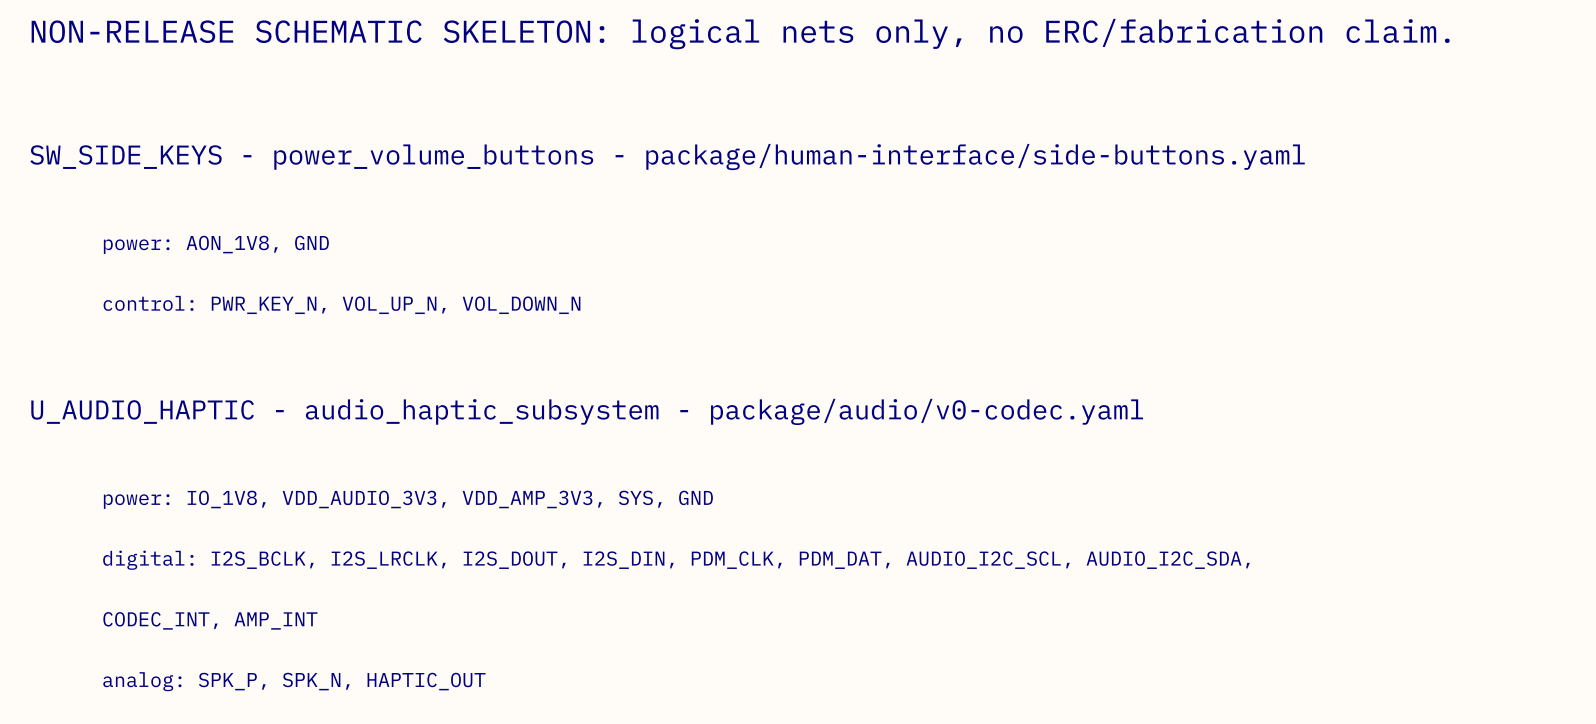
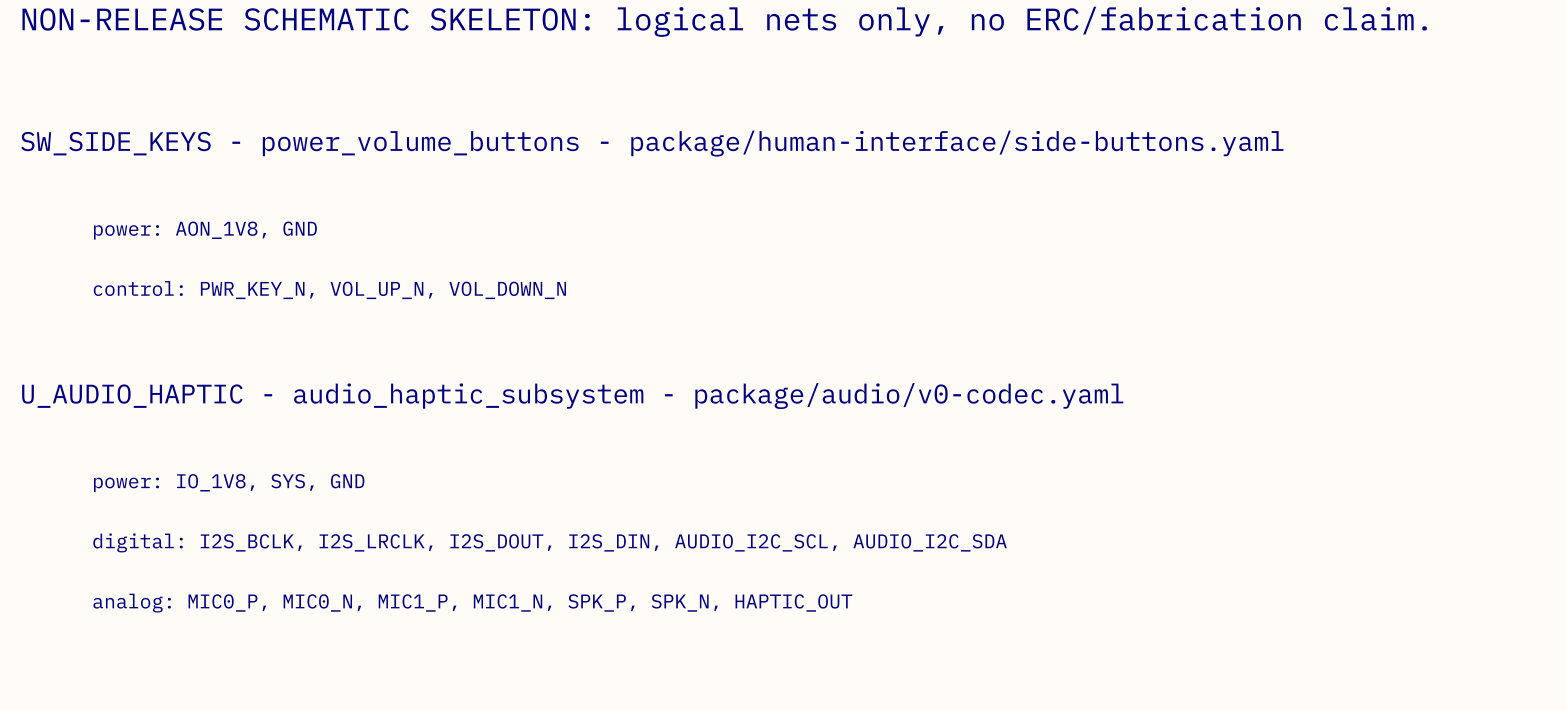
text: power: IO_1V8, VDD_AUDIO_3V3, VDD_AMP_3V3, SYS, GND (408, 499) -> power: IO_1V8, SYS, GND (229, 483)
text: digital: I2S_BCLK, I2S_LRCLK, I2S_DOUT, I2S_DIN, PDM_CLK, PDM_DAT, AUDIO_I2C_SCL, AUDIO_I2C_SDA, (676, 560) -> digital: I2S_BCLK, I2S_LRCLK, I2S_DOUT, I2S_DIN, AUDIO_I2C_SCL, AUDIO_I2C_SDA (550, 542)
text: CODEC_INT, AMP_INT (210, 620) -> analog: MIC0_P, MIC0_N, MIC1_P, MIC1_N, SPK_P, SPK_N, HAPTIC_OUT (472, 603)
text: analog: SPK_P, SPK_N, HAPTIC_OUT (294, 681) -> none

